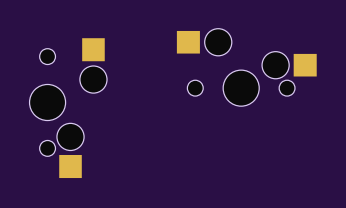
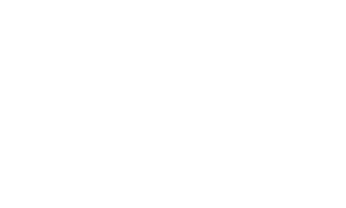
part: (246, 67) -> none
part: (68, 108) -> none

